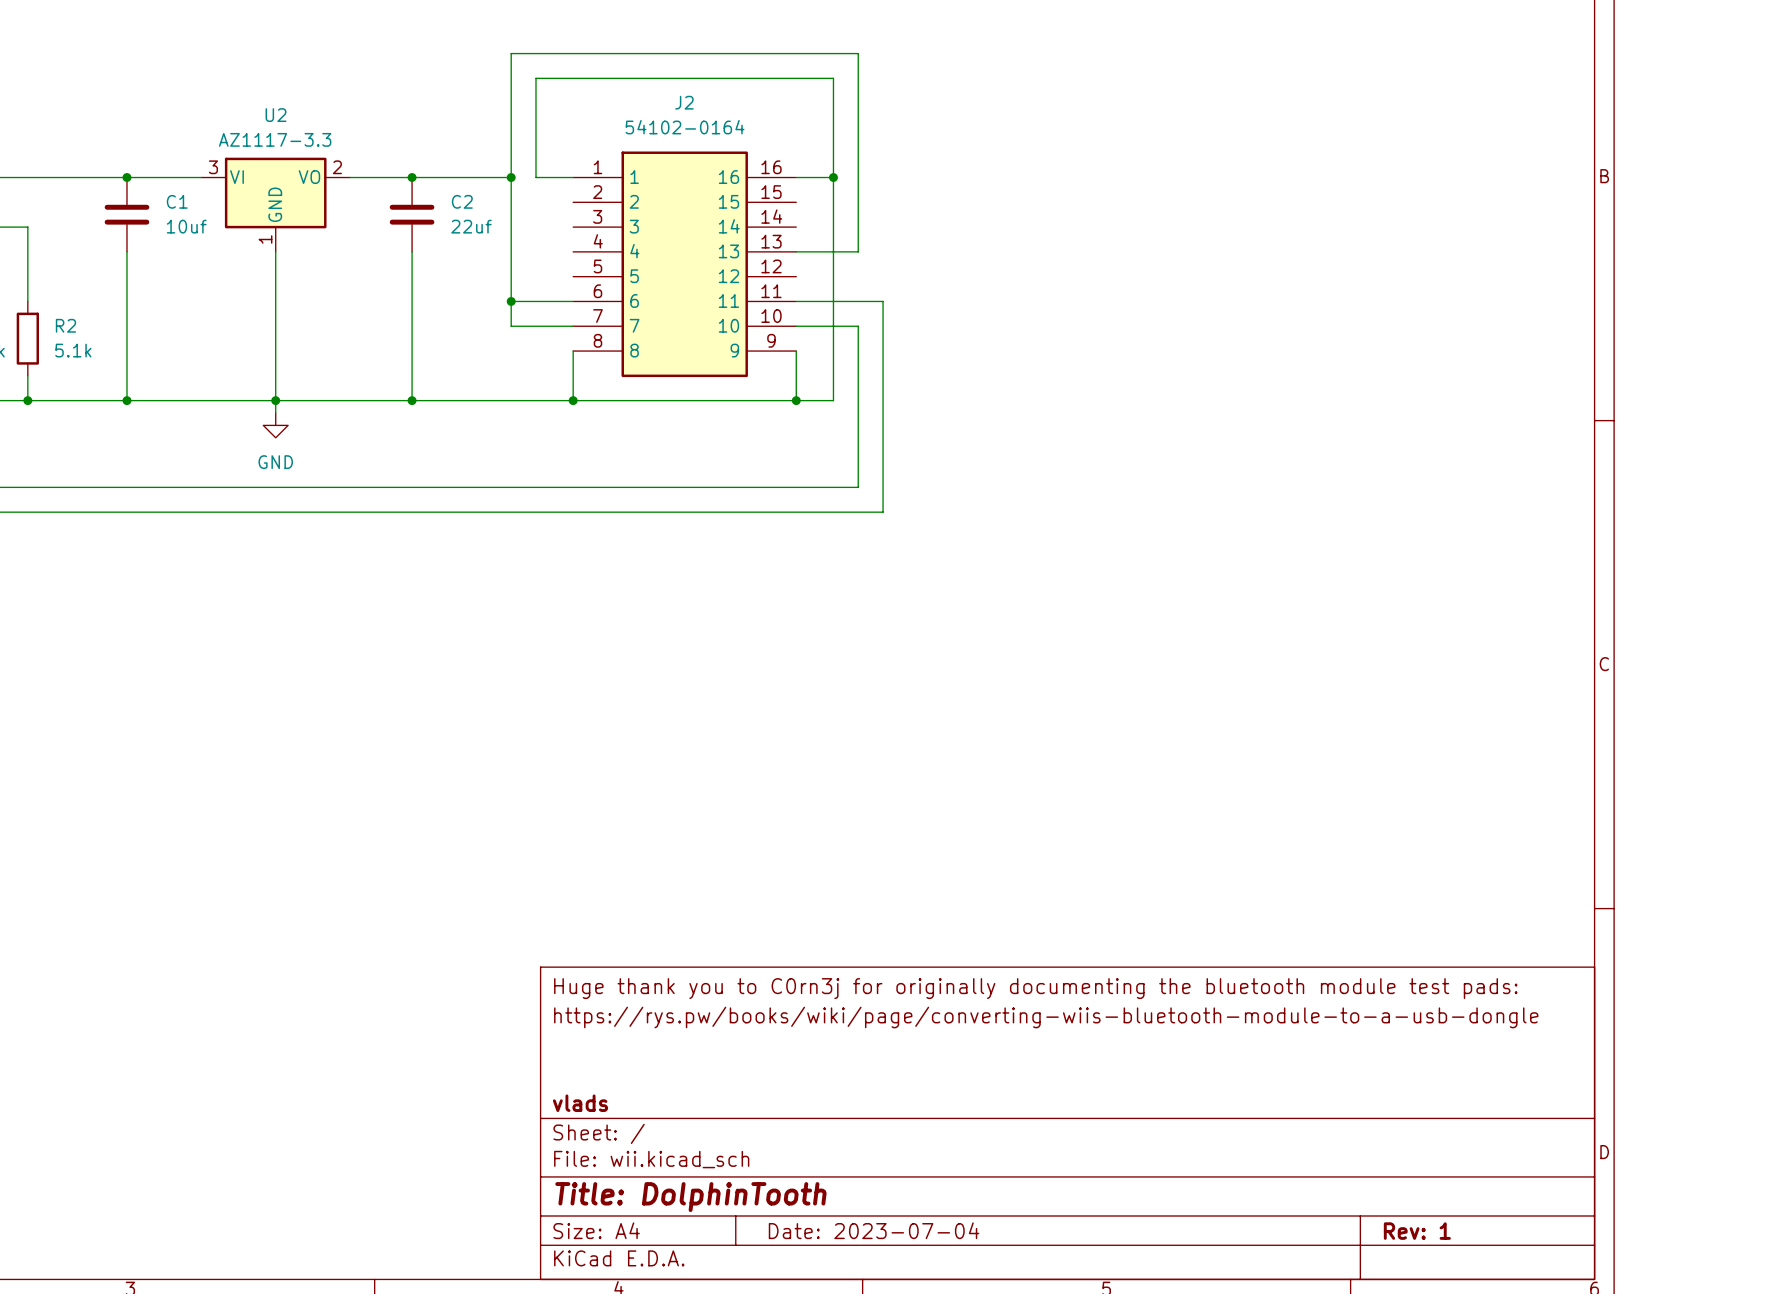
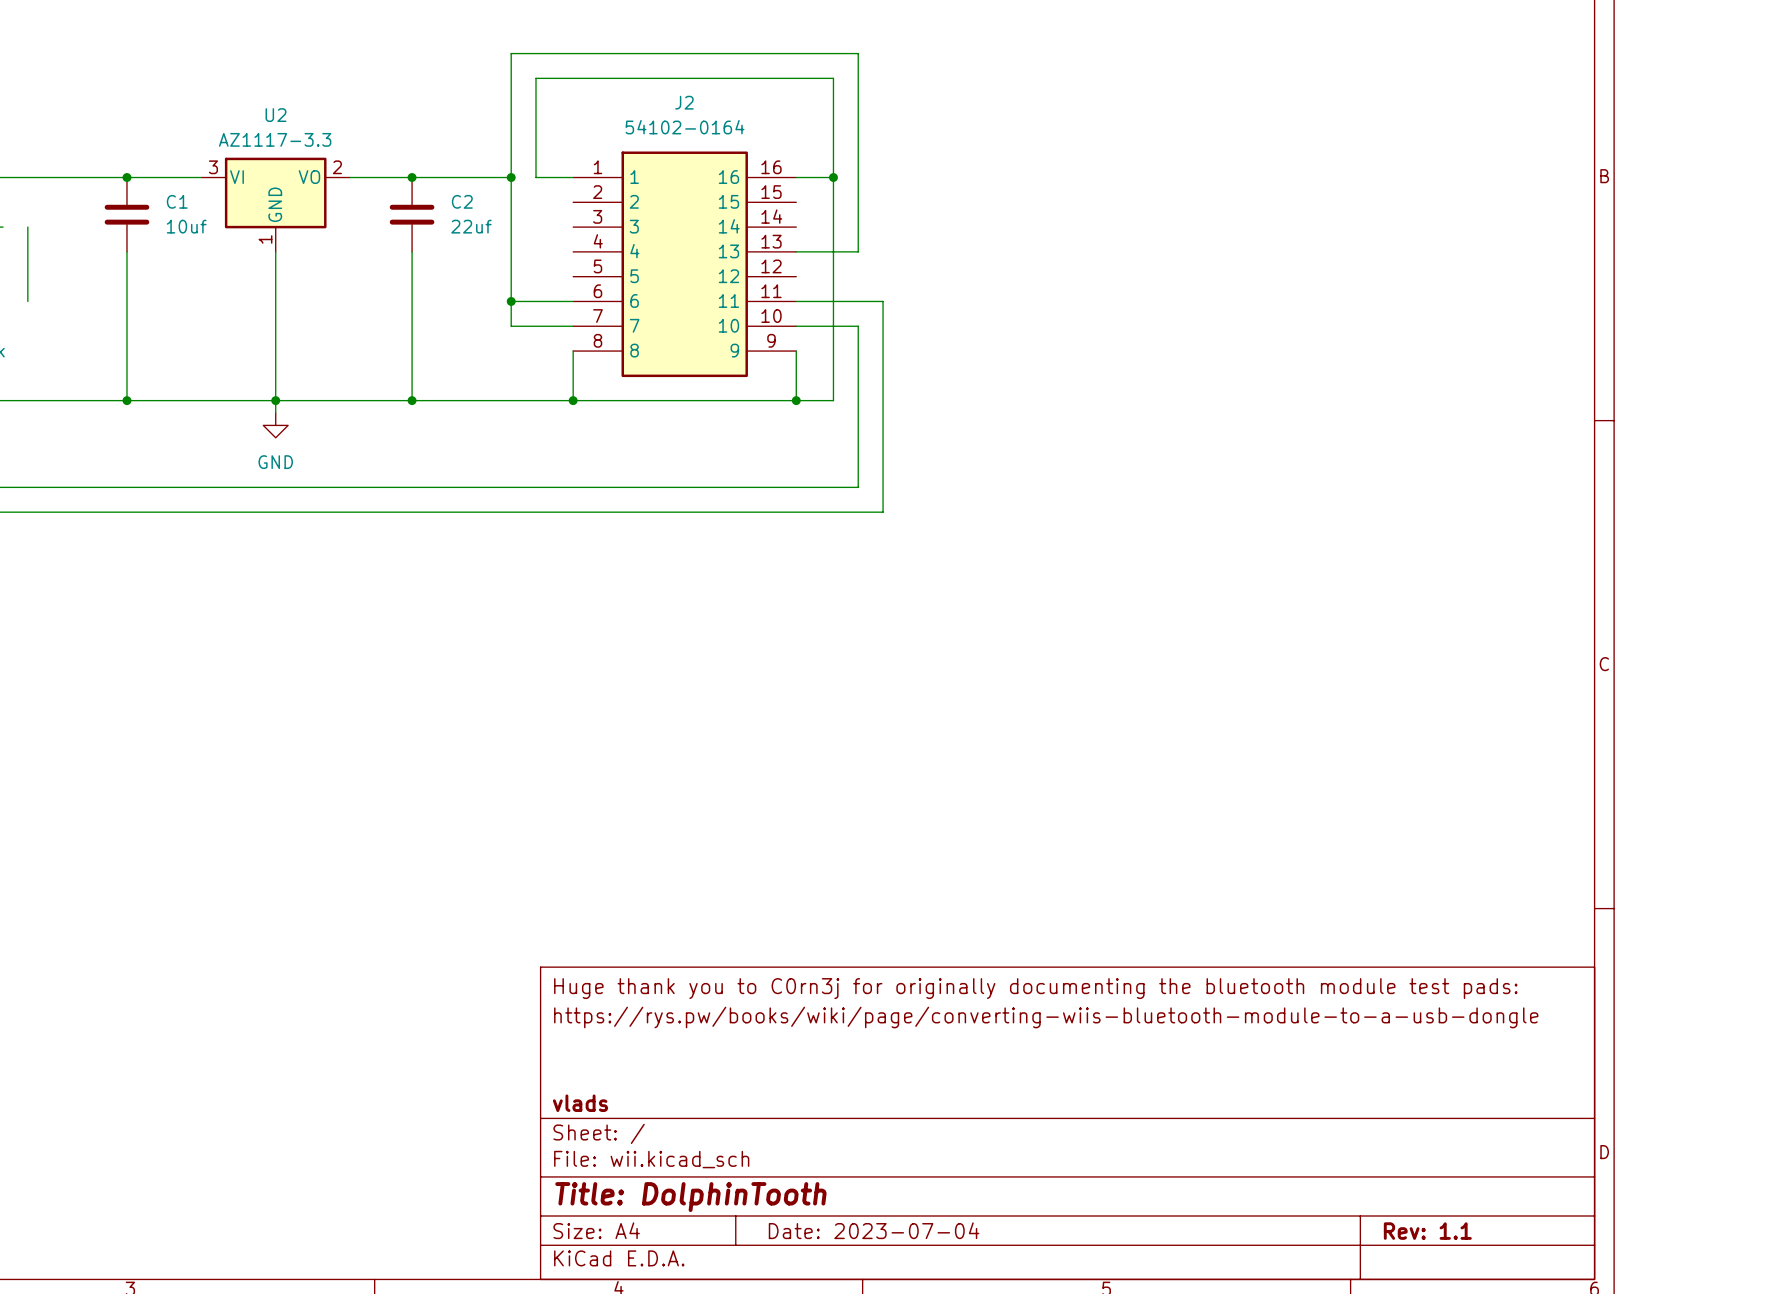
wire: (3, 227) (27, 227) -> none
R2: 5.1k (27, 338) -> none
wire: (27, 375) (27, 400) -> none
junction: (27, 400) -> none
title block: Rev: 1 (1417, 1231) -> Rev: 1.1 (1427, 1231)

